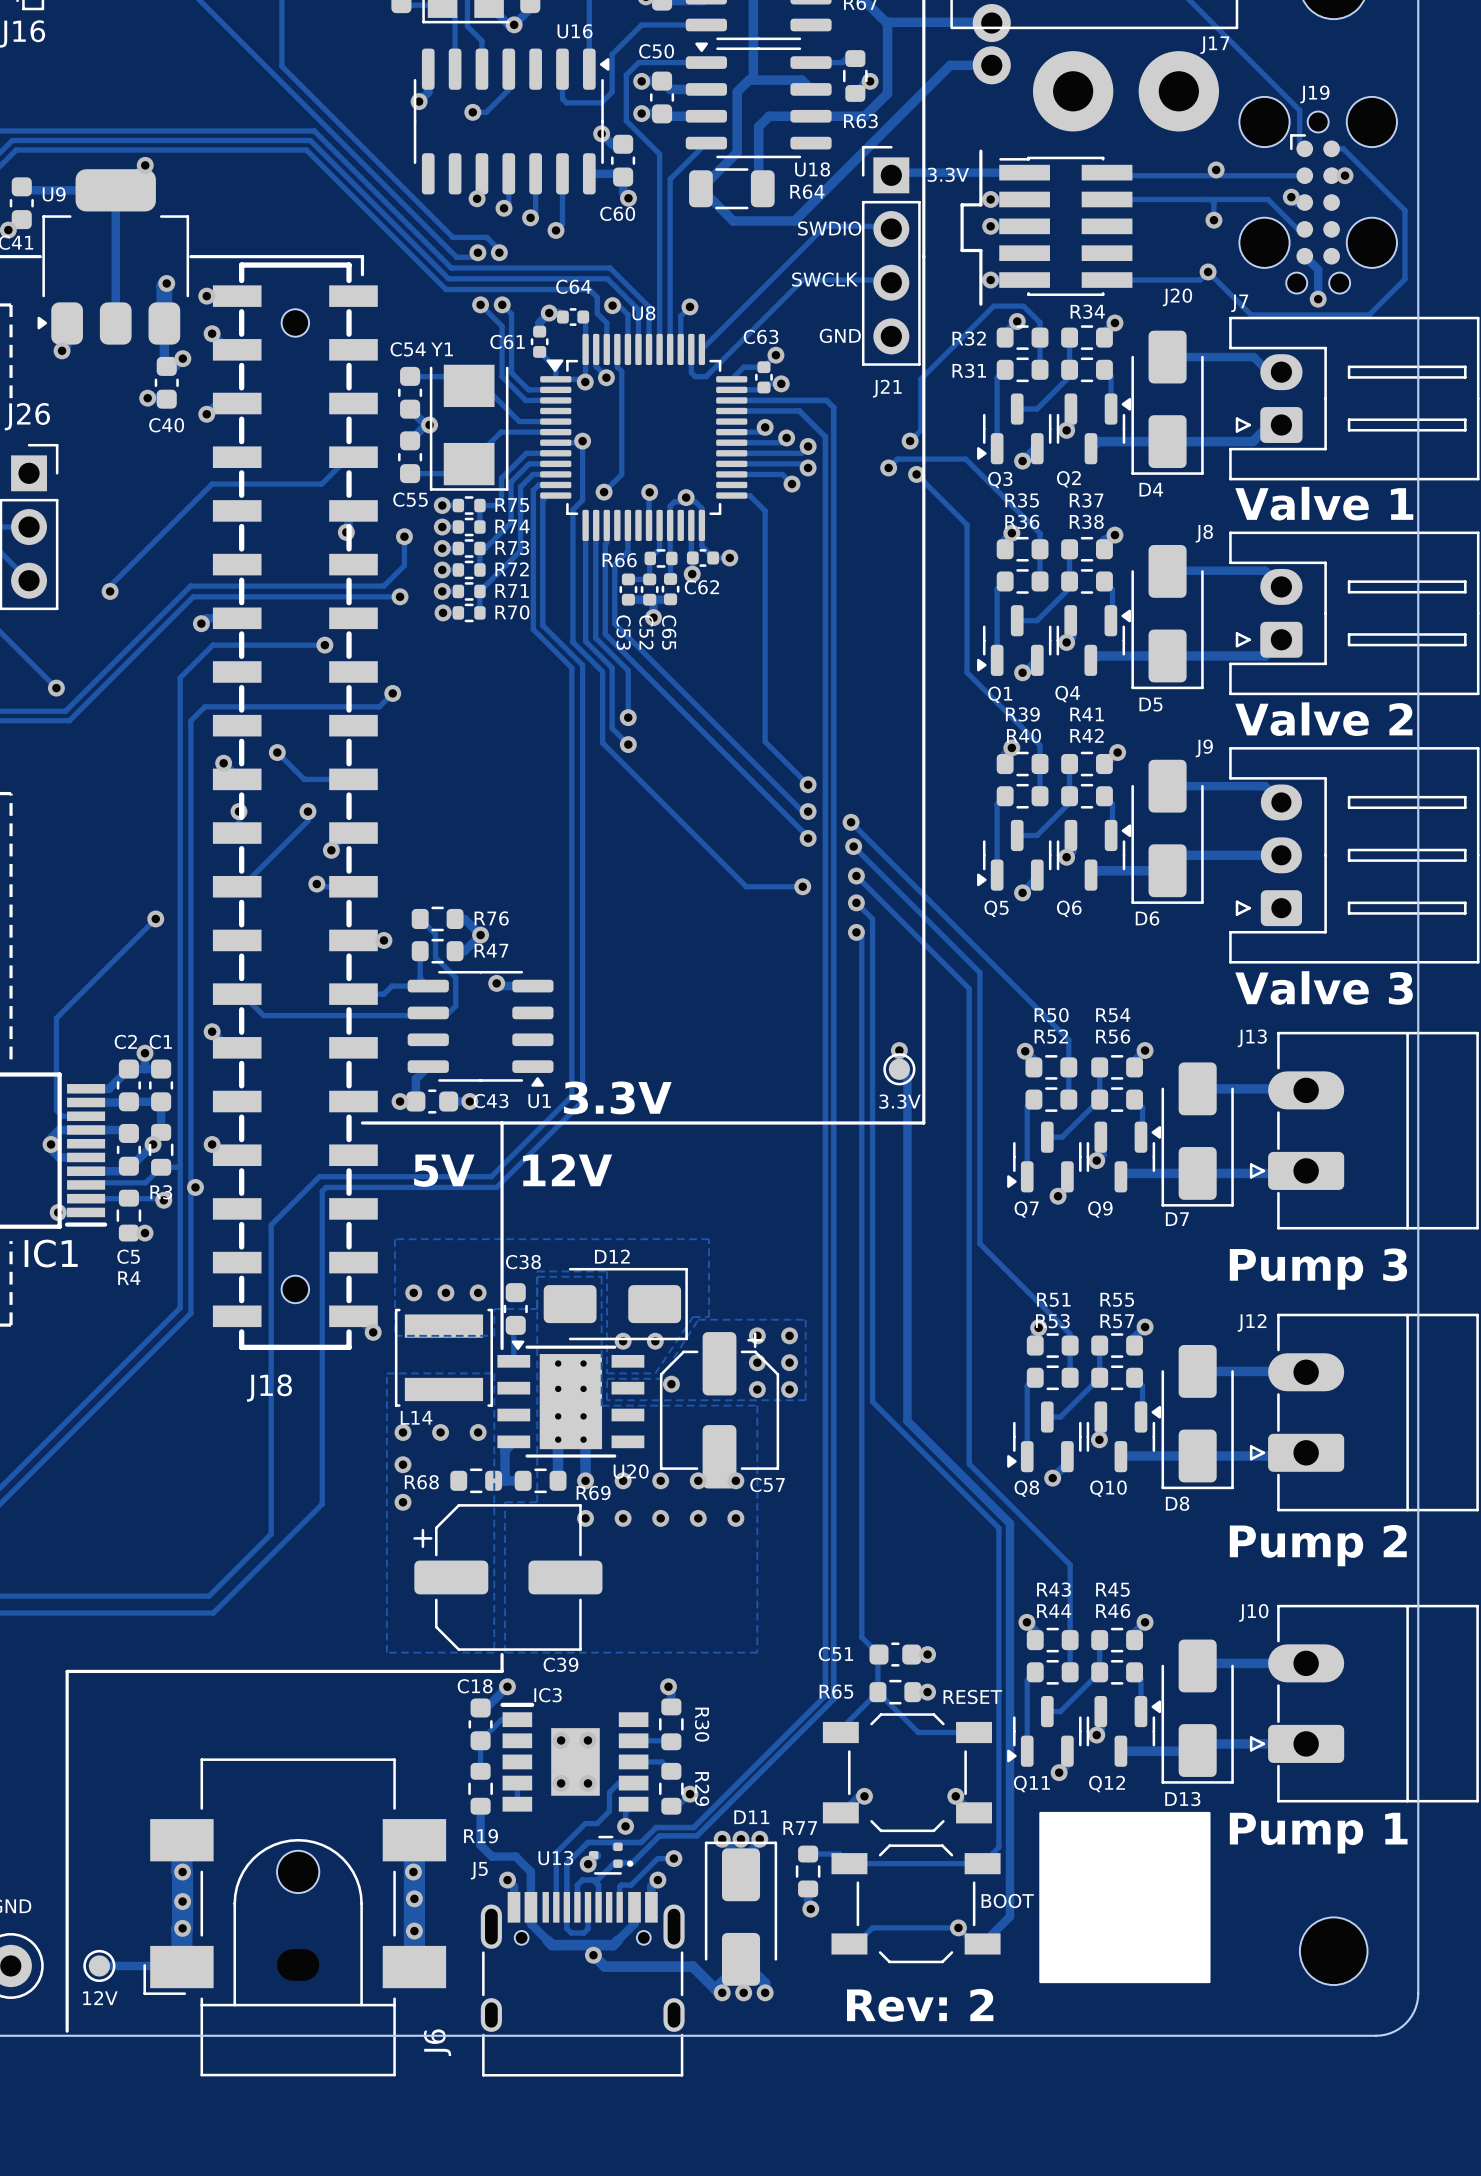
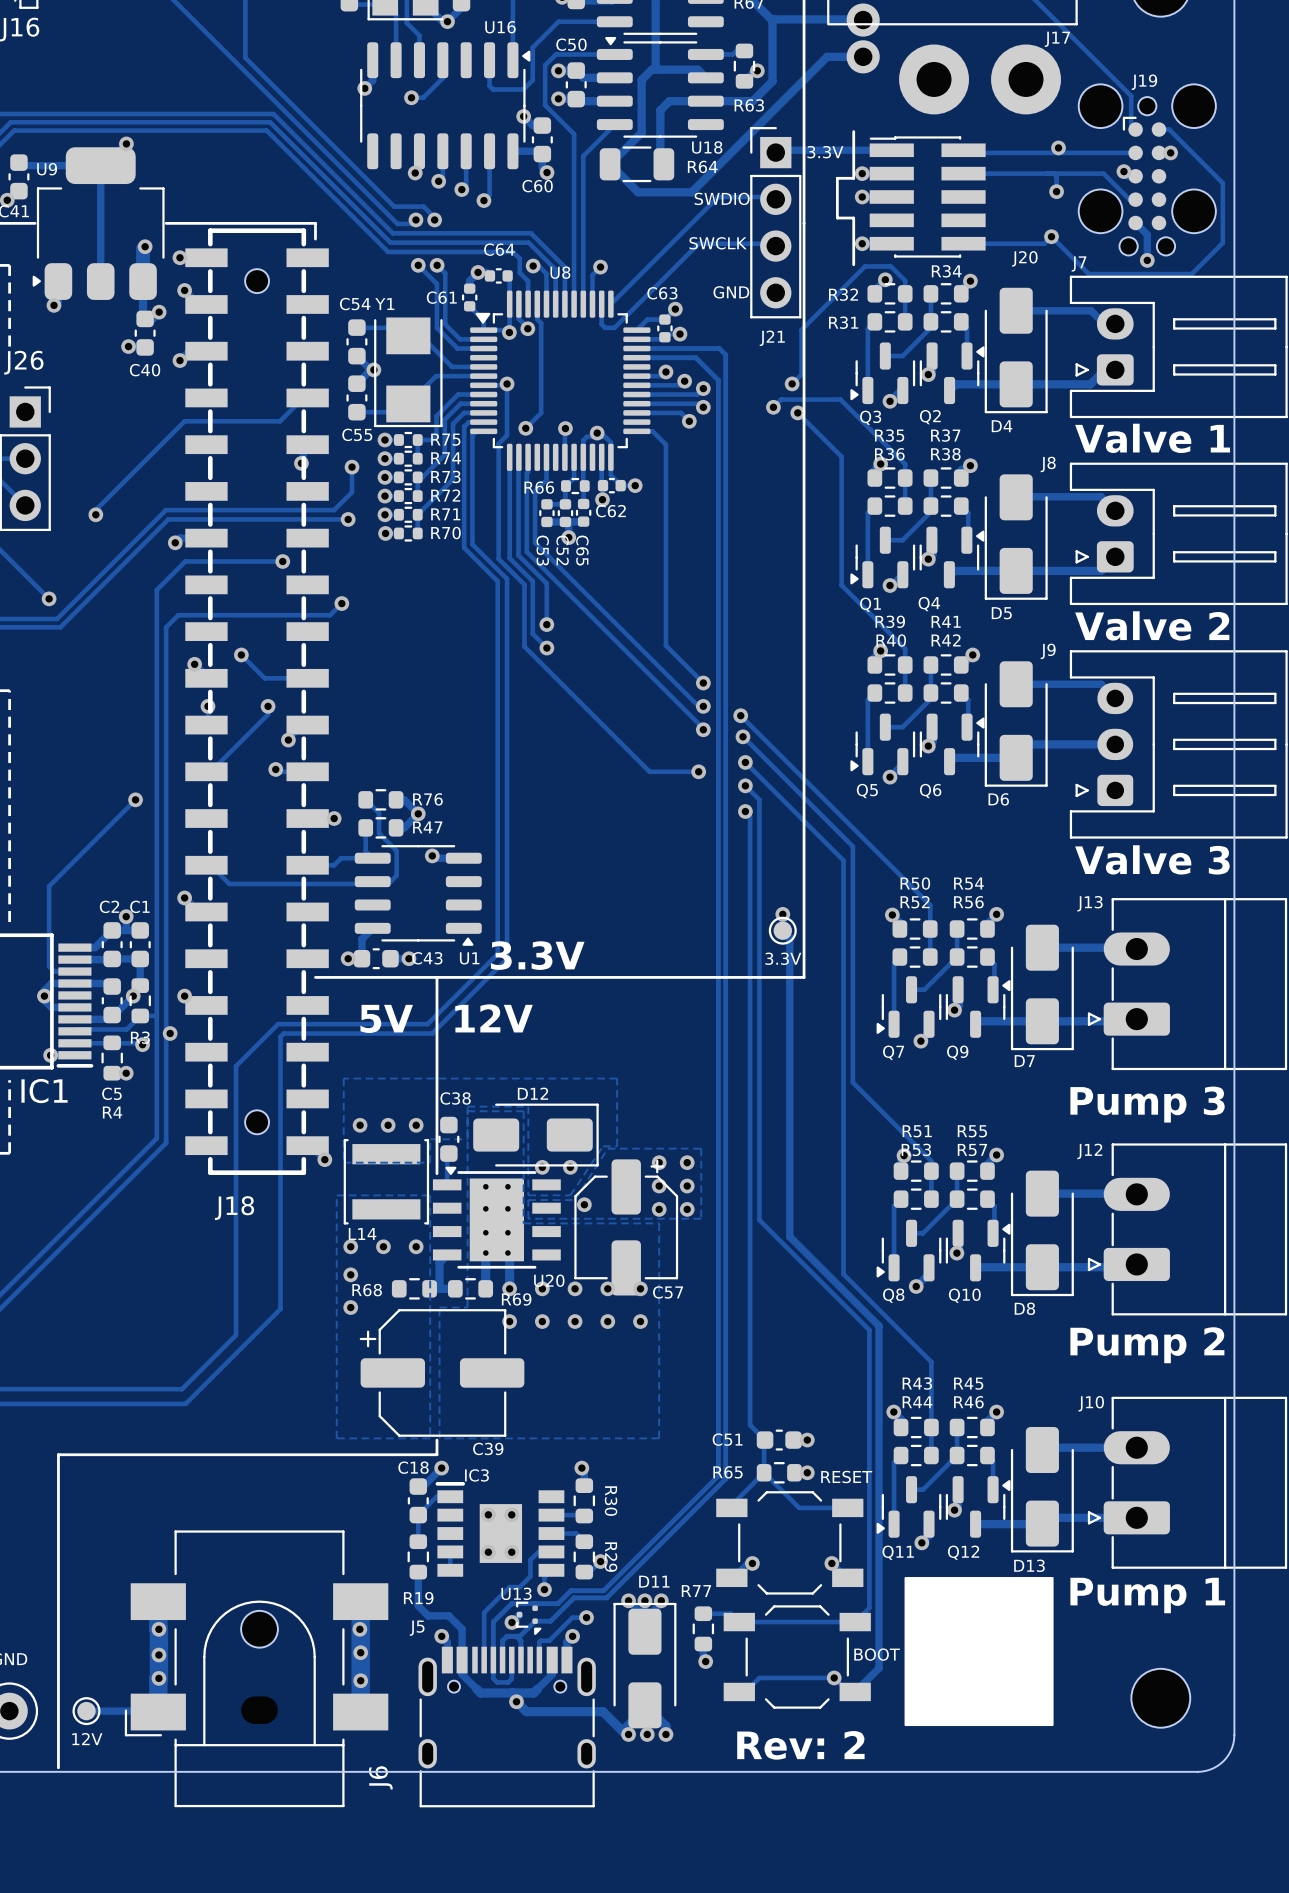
U13 footprint: [588, 1835, 634, 1875] -> [516, 1601, 542, 1635]
U13 name position: U13 (555, 1858) -> U13 (516, 1593)

